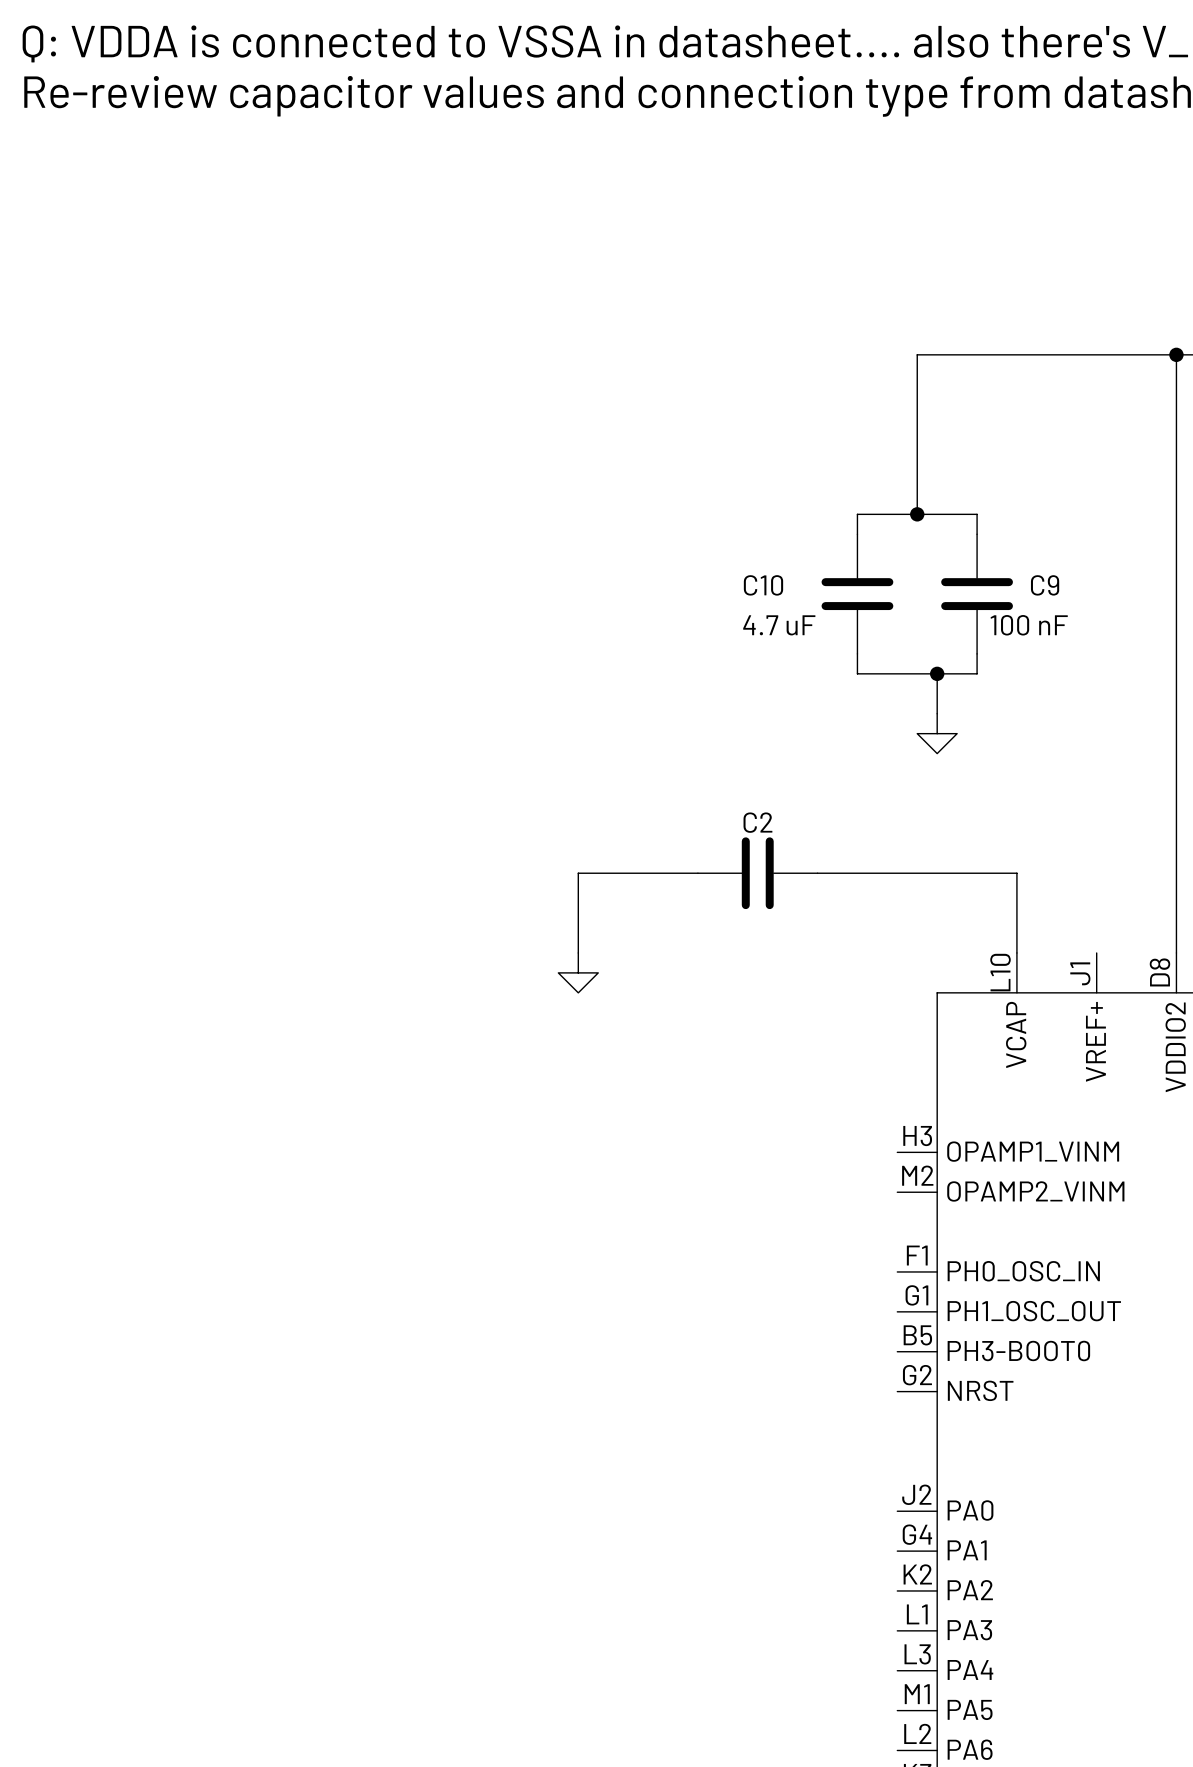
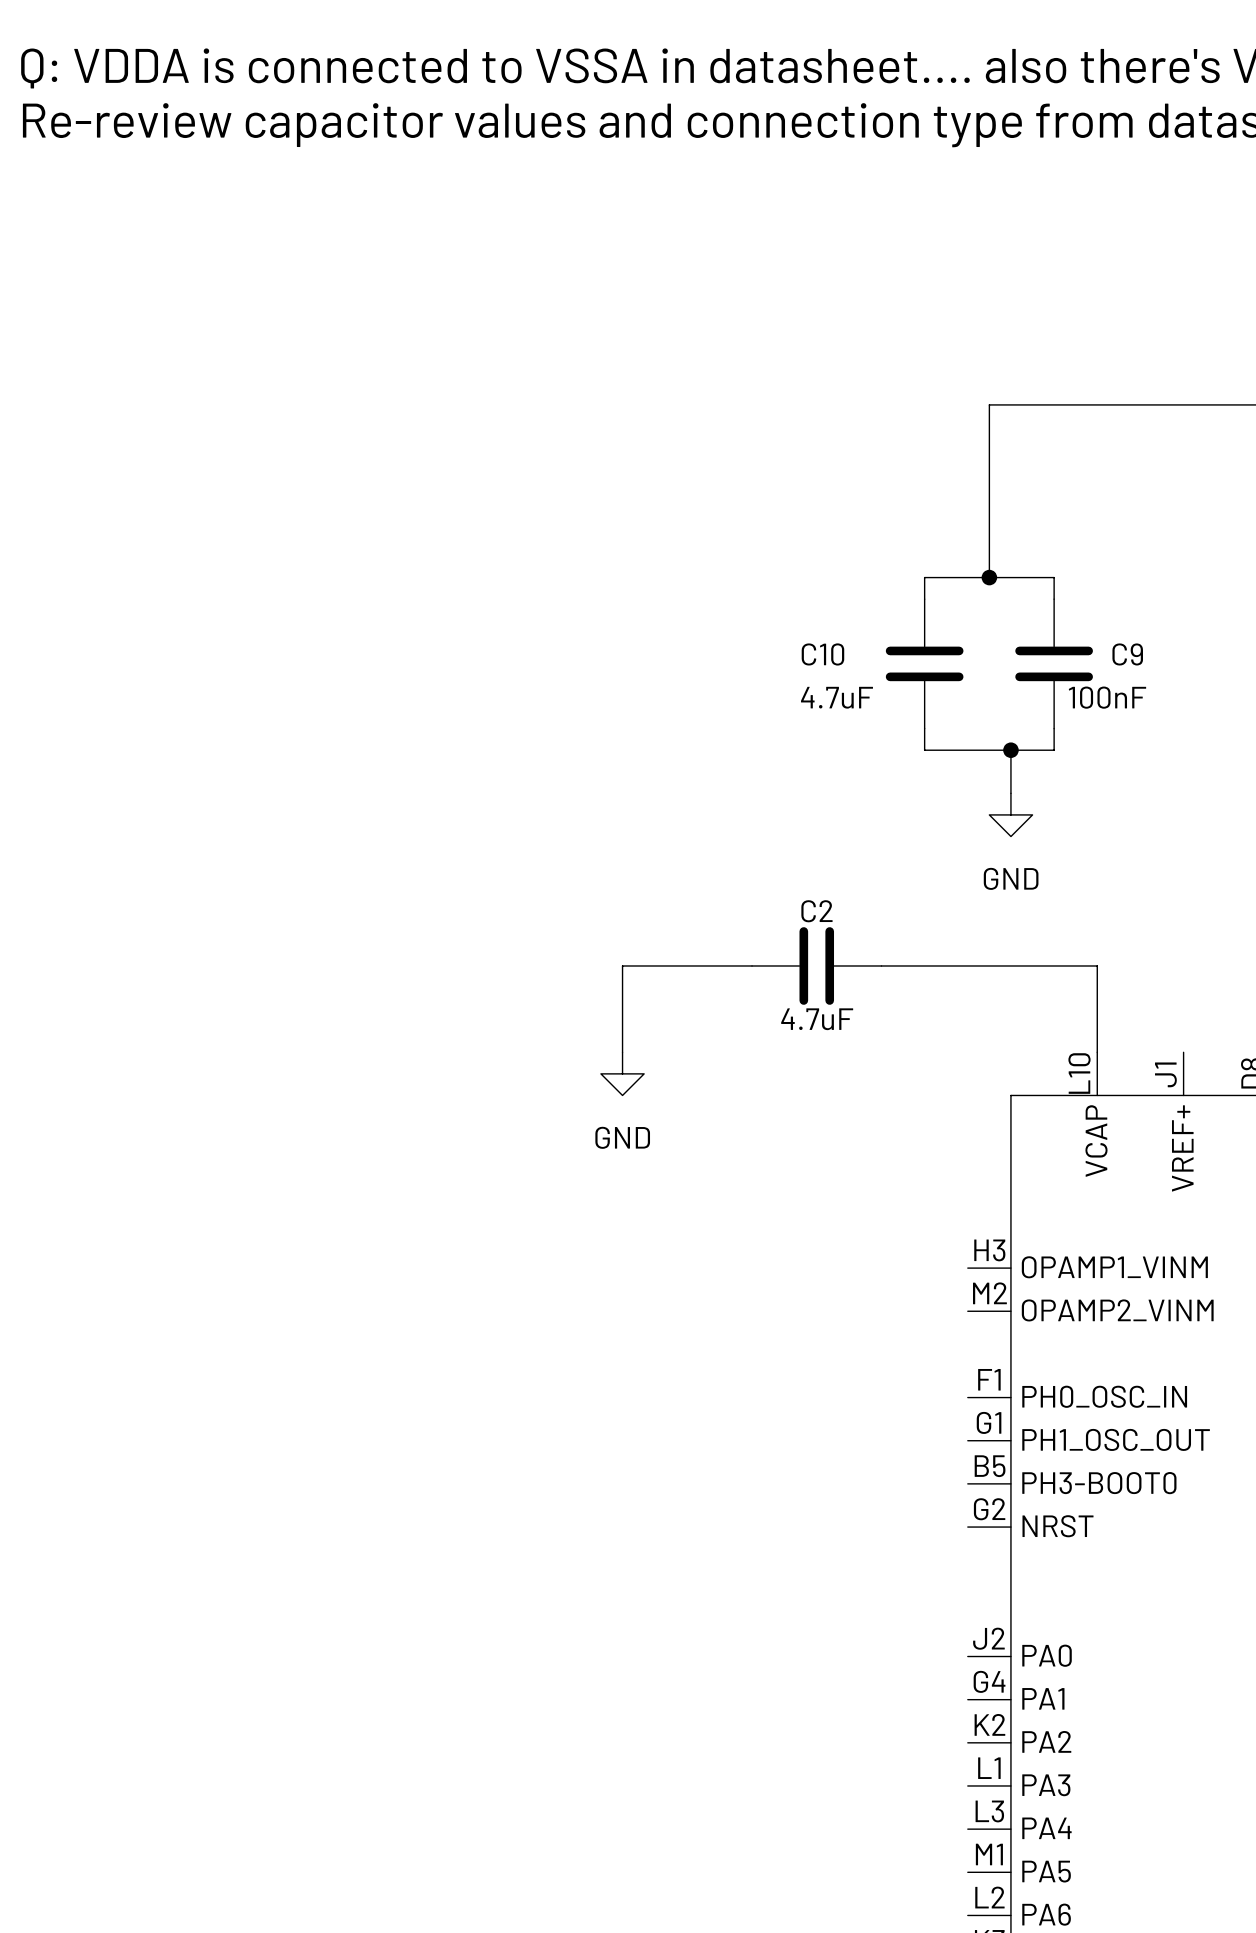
C10 value: 4.7 uF (779, 625) -> 4.7uF (836, 697)
C9 value: 100 nF (1029, 625) -> 100nF (1107, 697)
power symbol text: none -> GND (1011, 878)
C2 value: none -> 4.7uF (817, 1019)
power symbol text: none -> GND (622, 1137)

